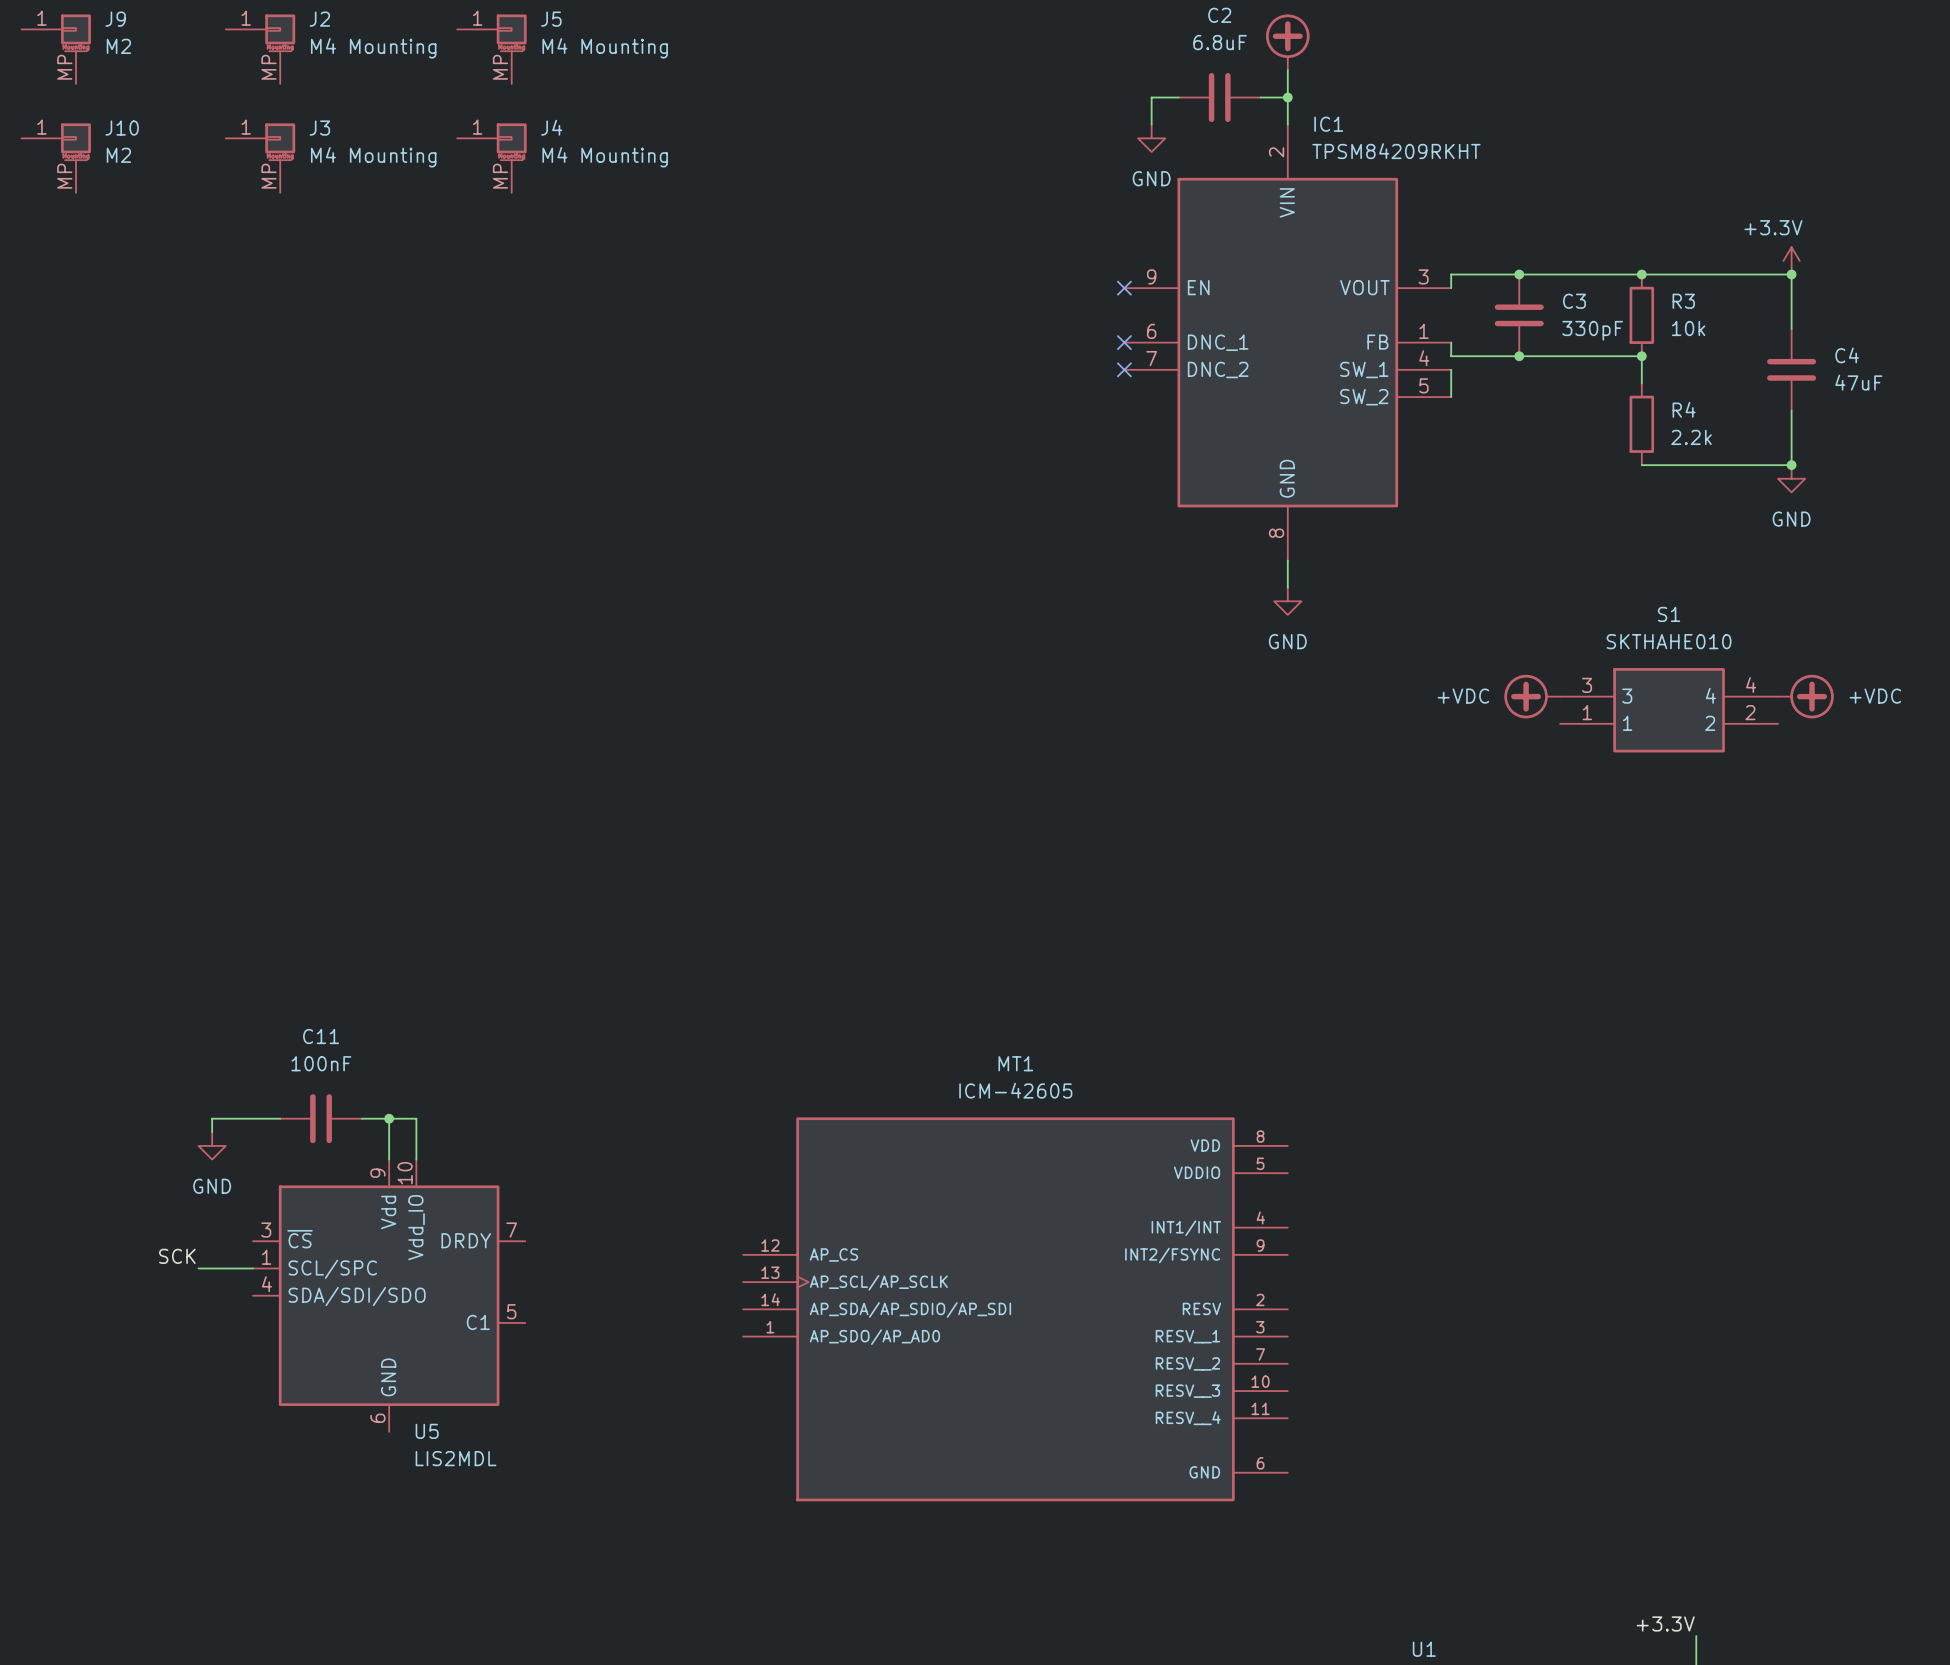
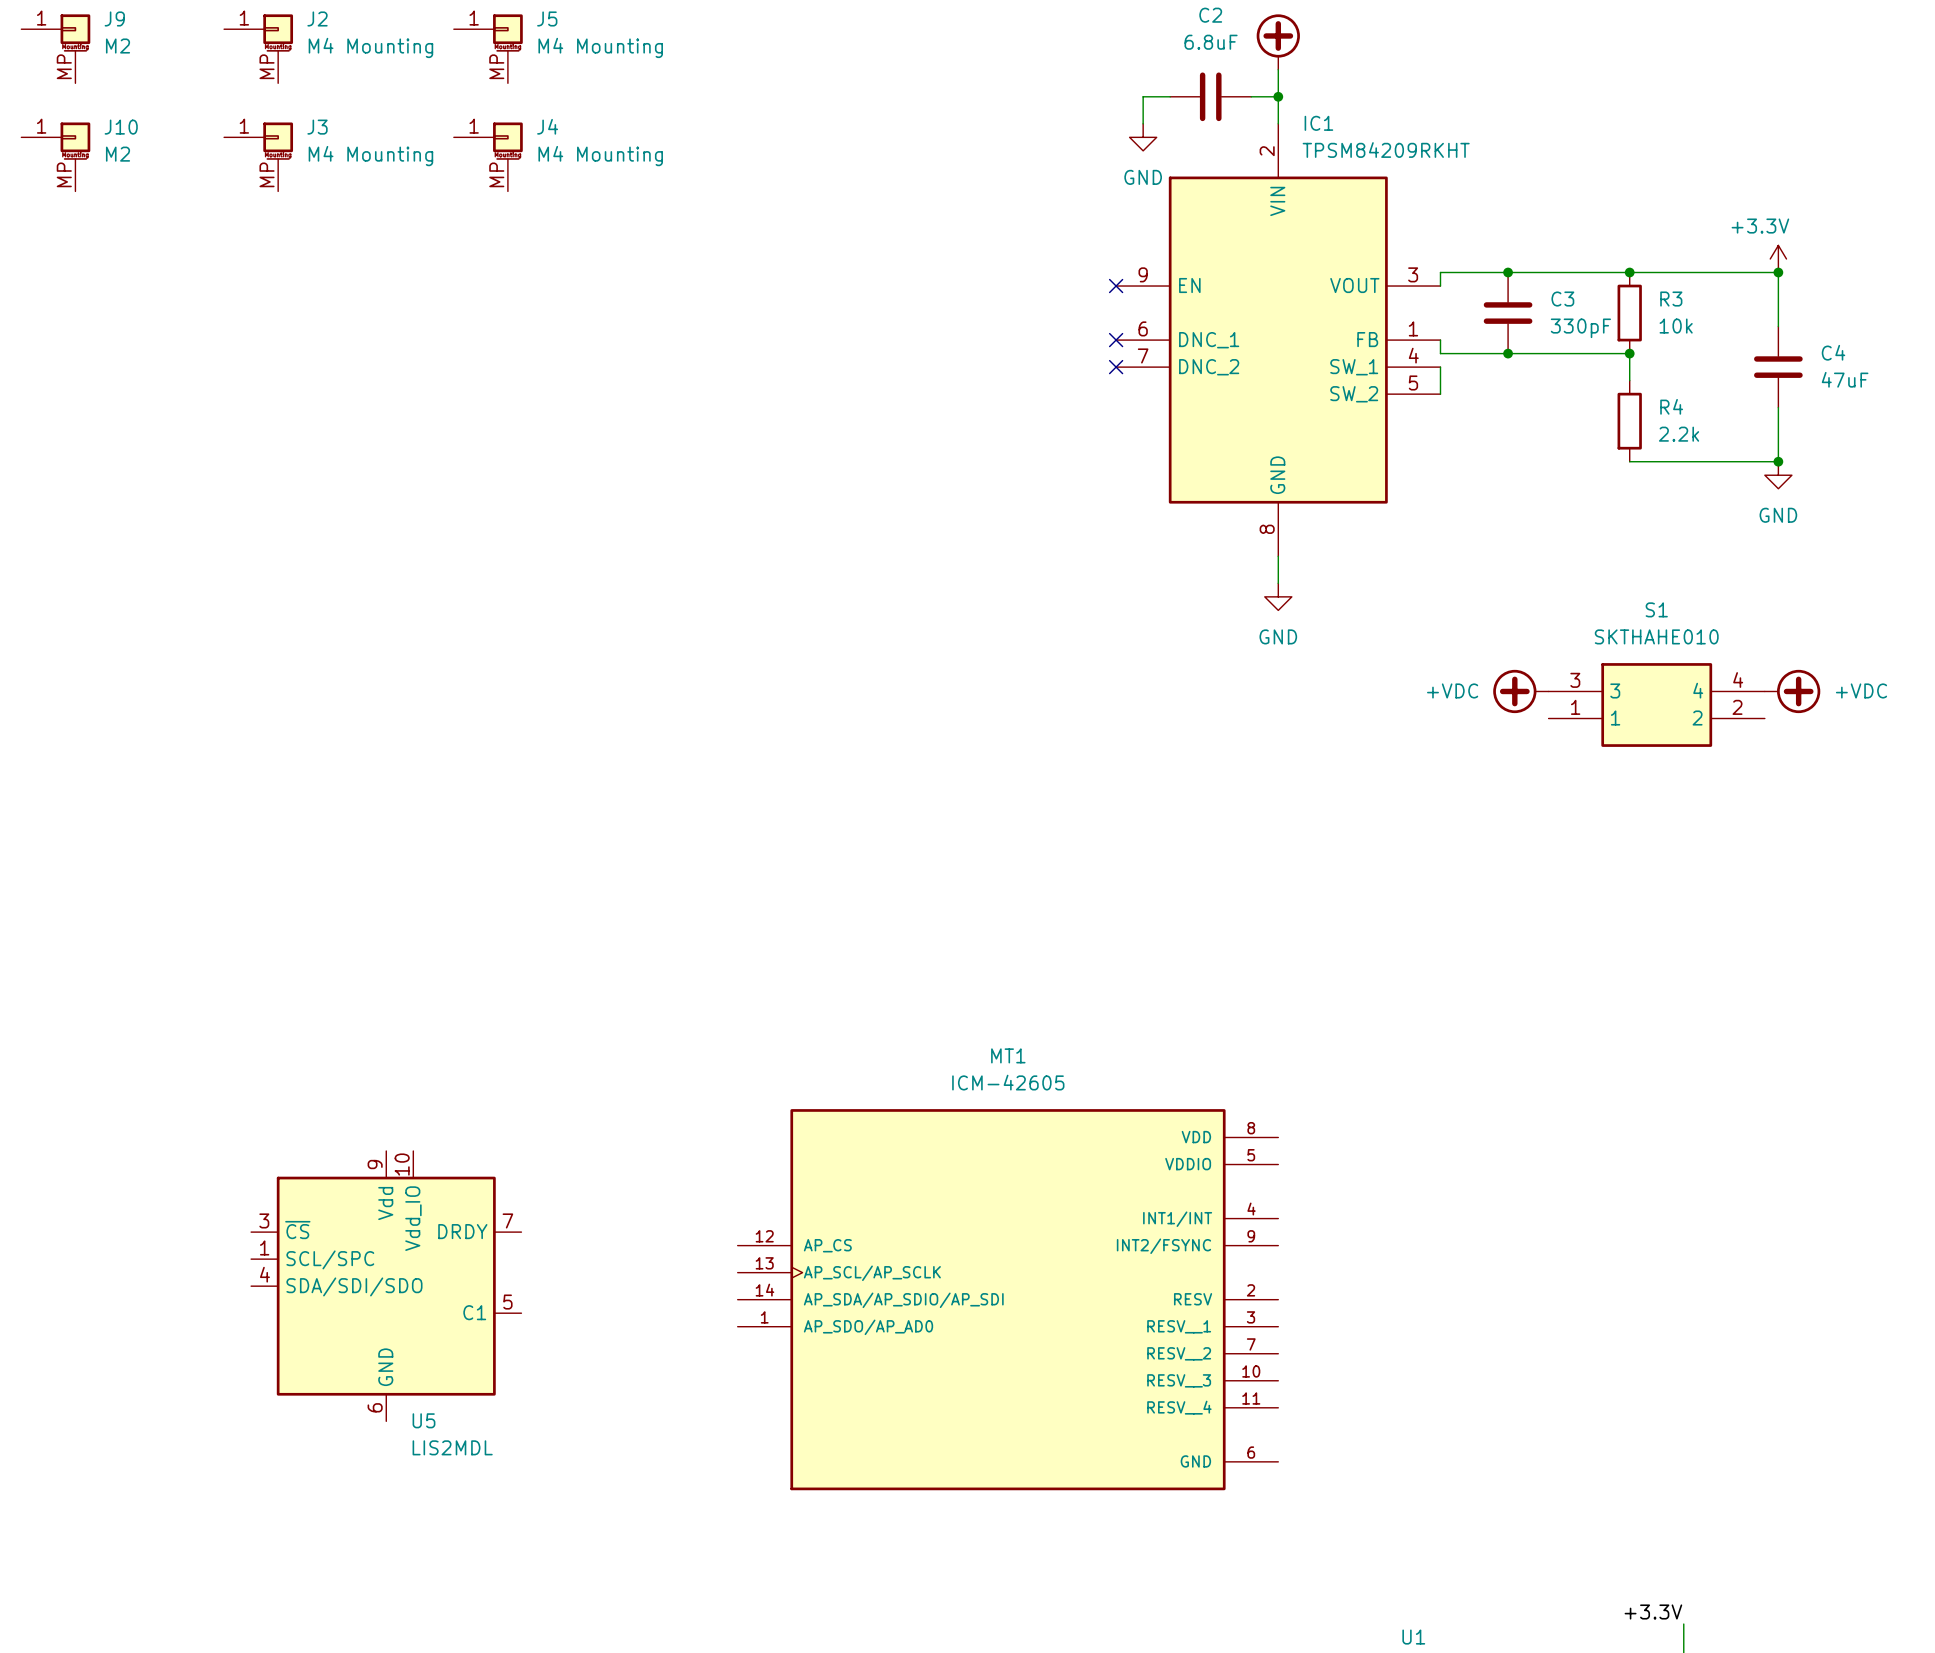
wire: (280, 1118) (212, 1118) (212, 1132) -> none
C11: 100nF (321, 1118) -> none
wire: (361, 1118) (416, 1118) (416, 1159) -> none
wire: (389, 1118) (389, 1159) -> none
junction: (389, 1118) -> none
power symbol: GND (212, 1145) -> none
label: SCK (177, 1256) -> none
wire: (198, 1268) (252, 1268) -> none

